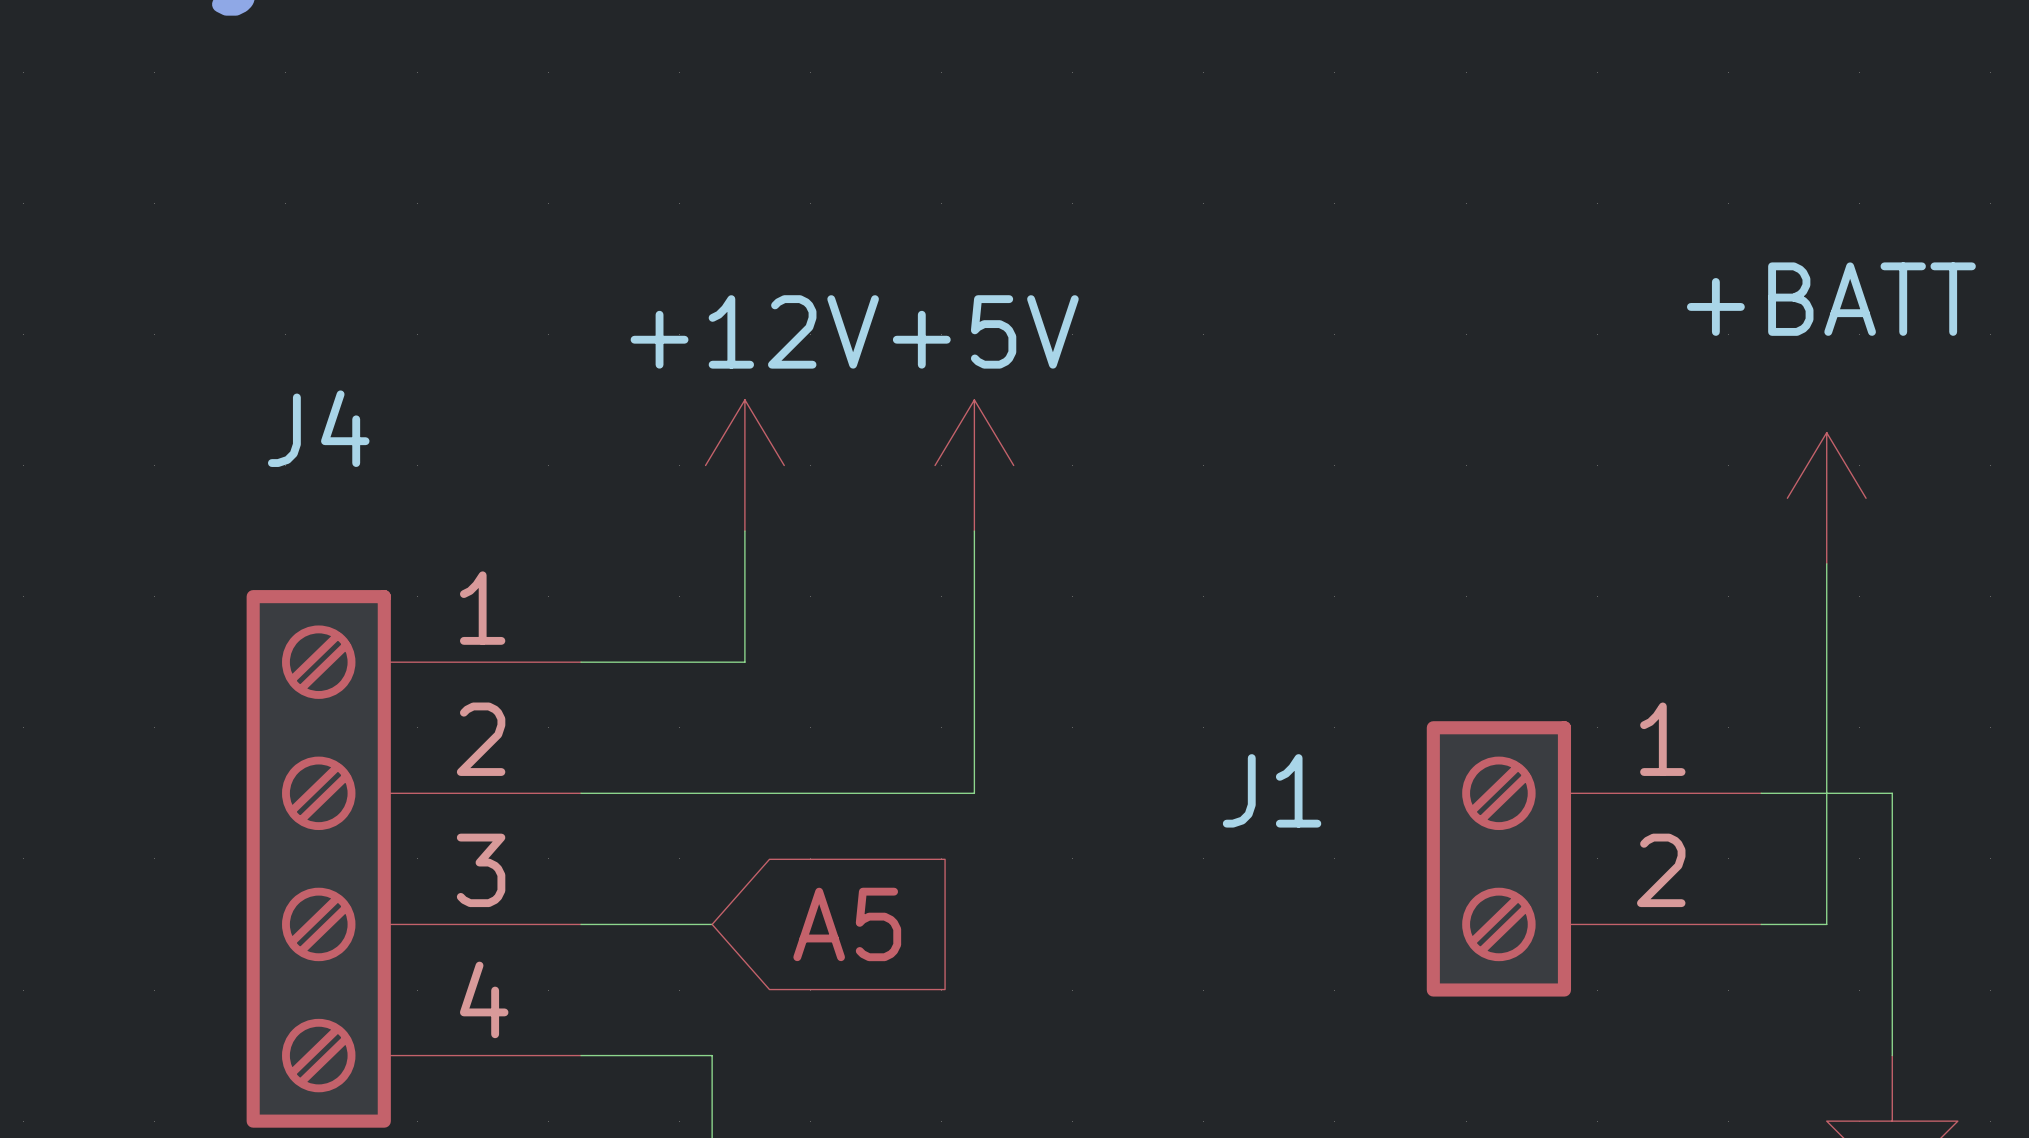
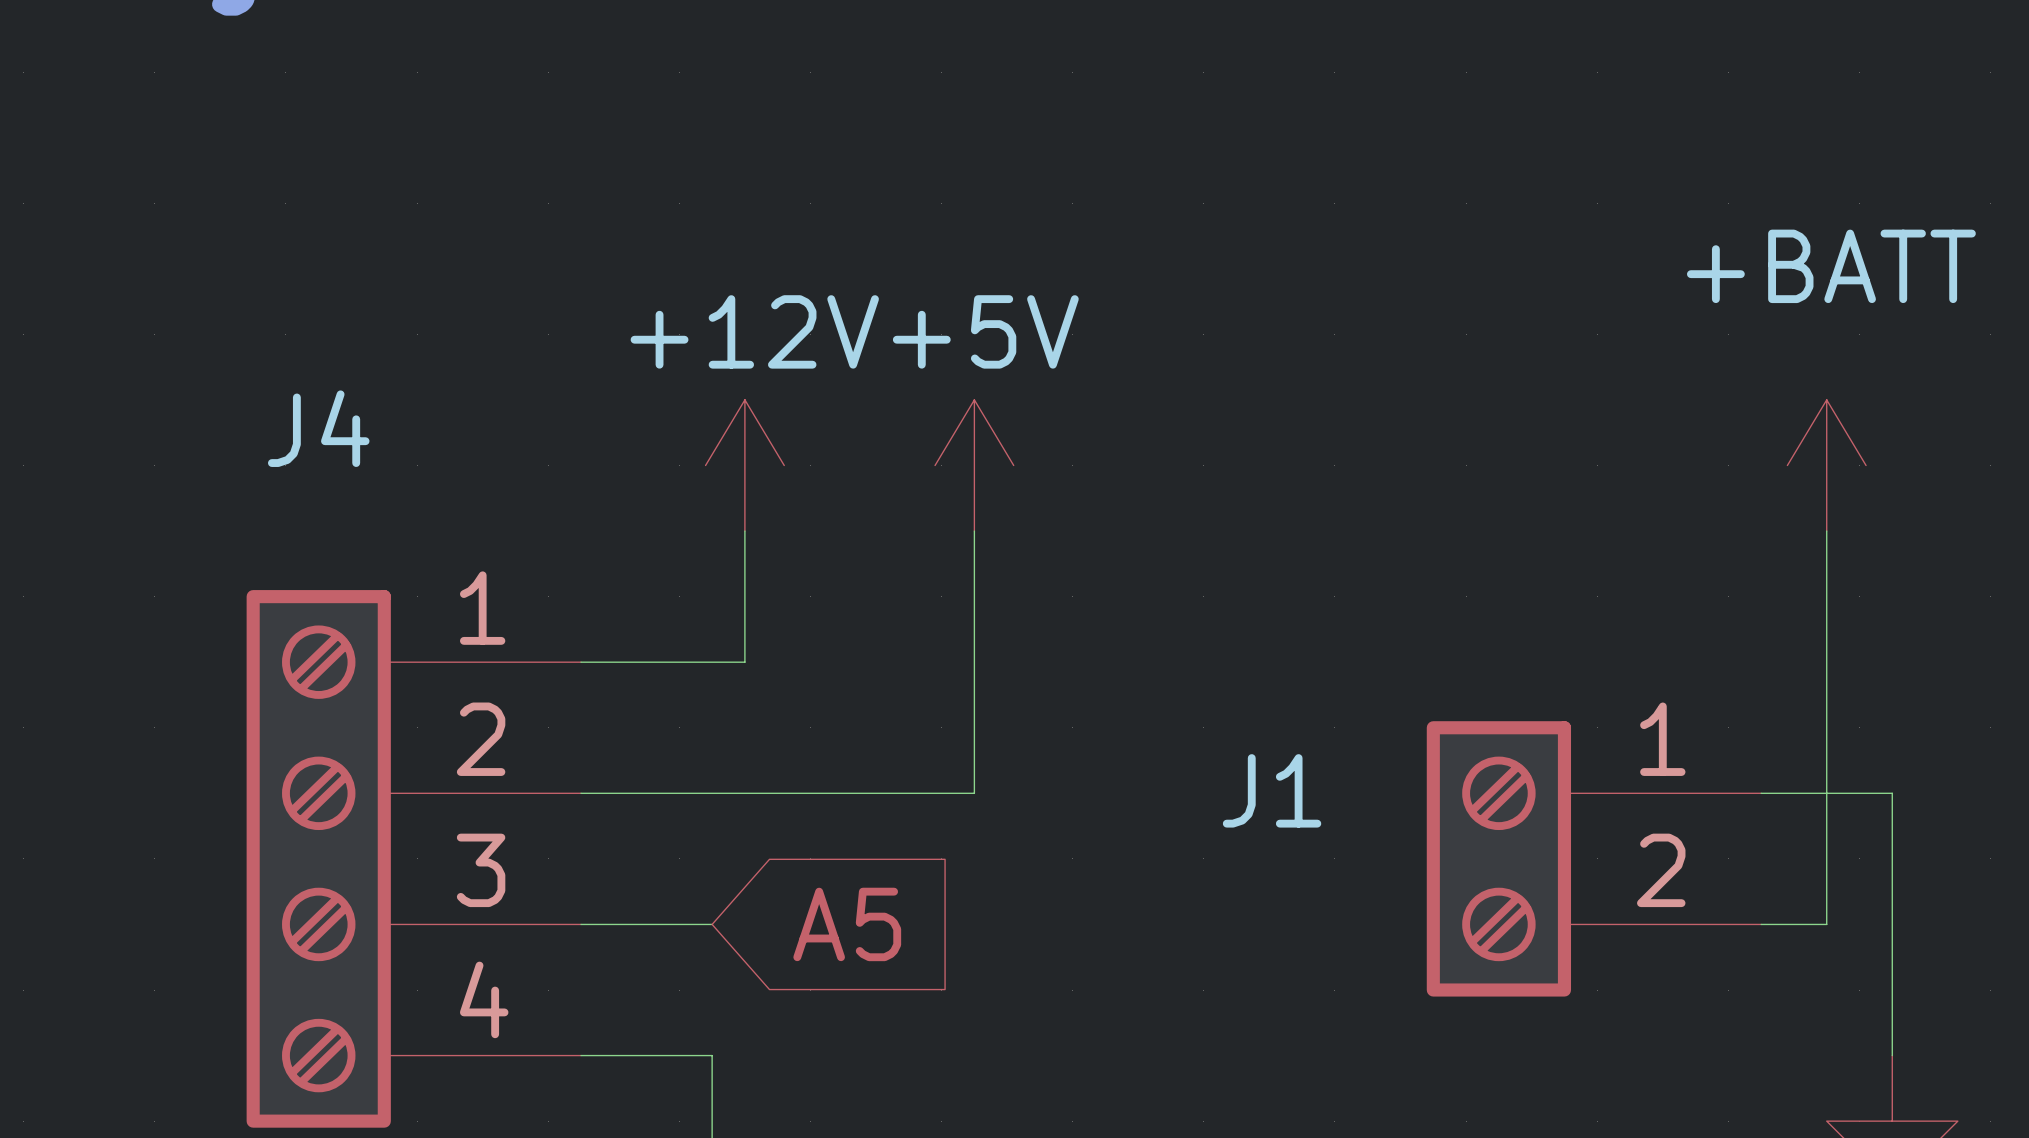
power symbol position: +BATT (1826, 498) -> +BATT (1826, 465)

